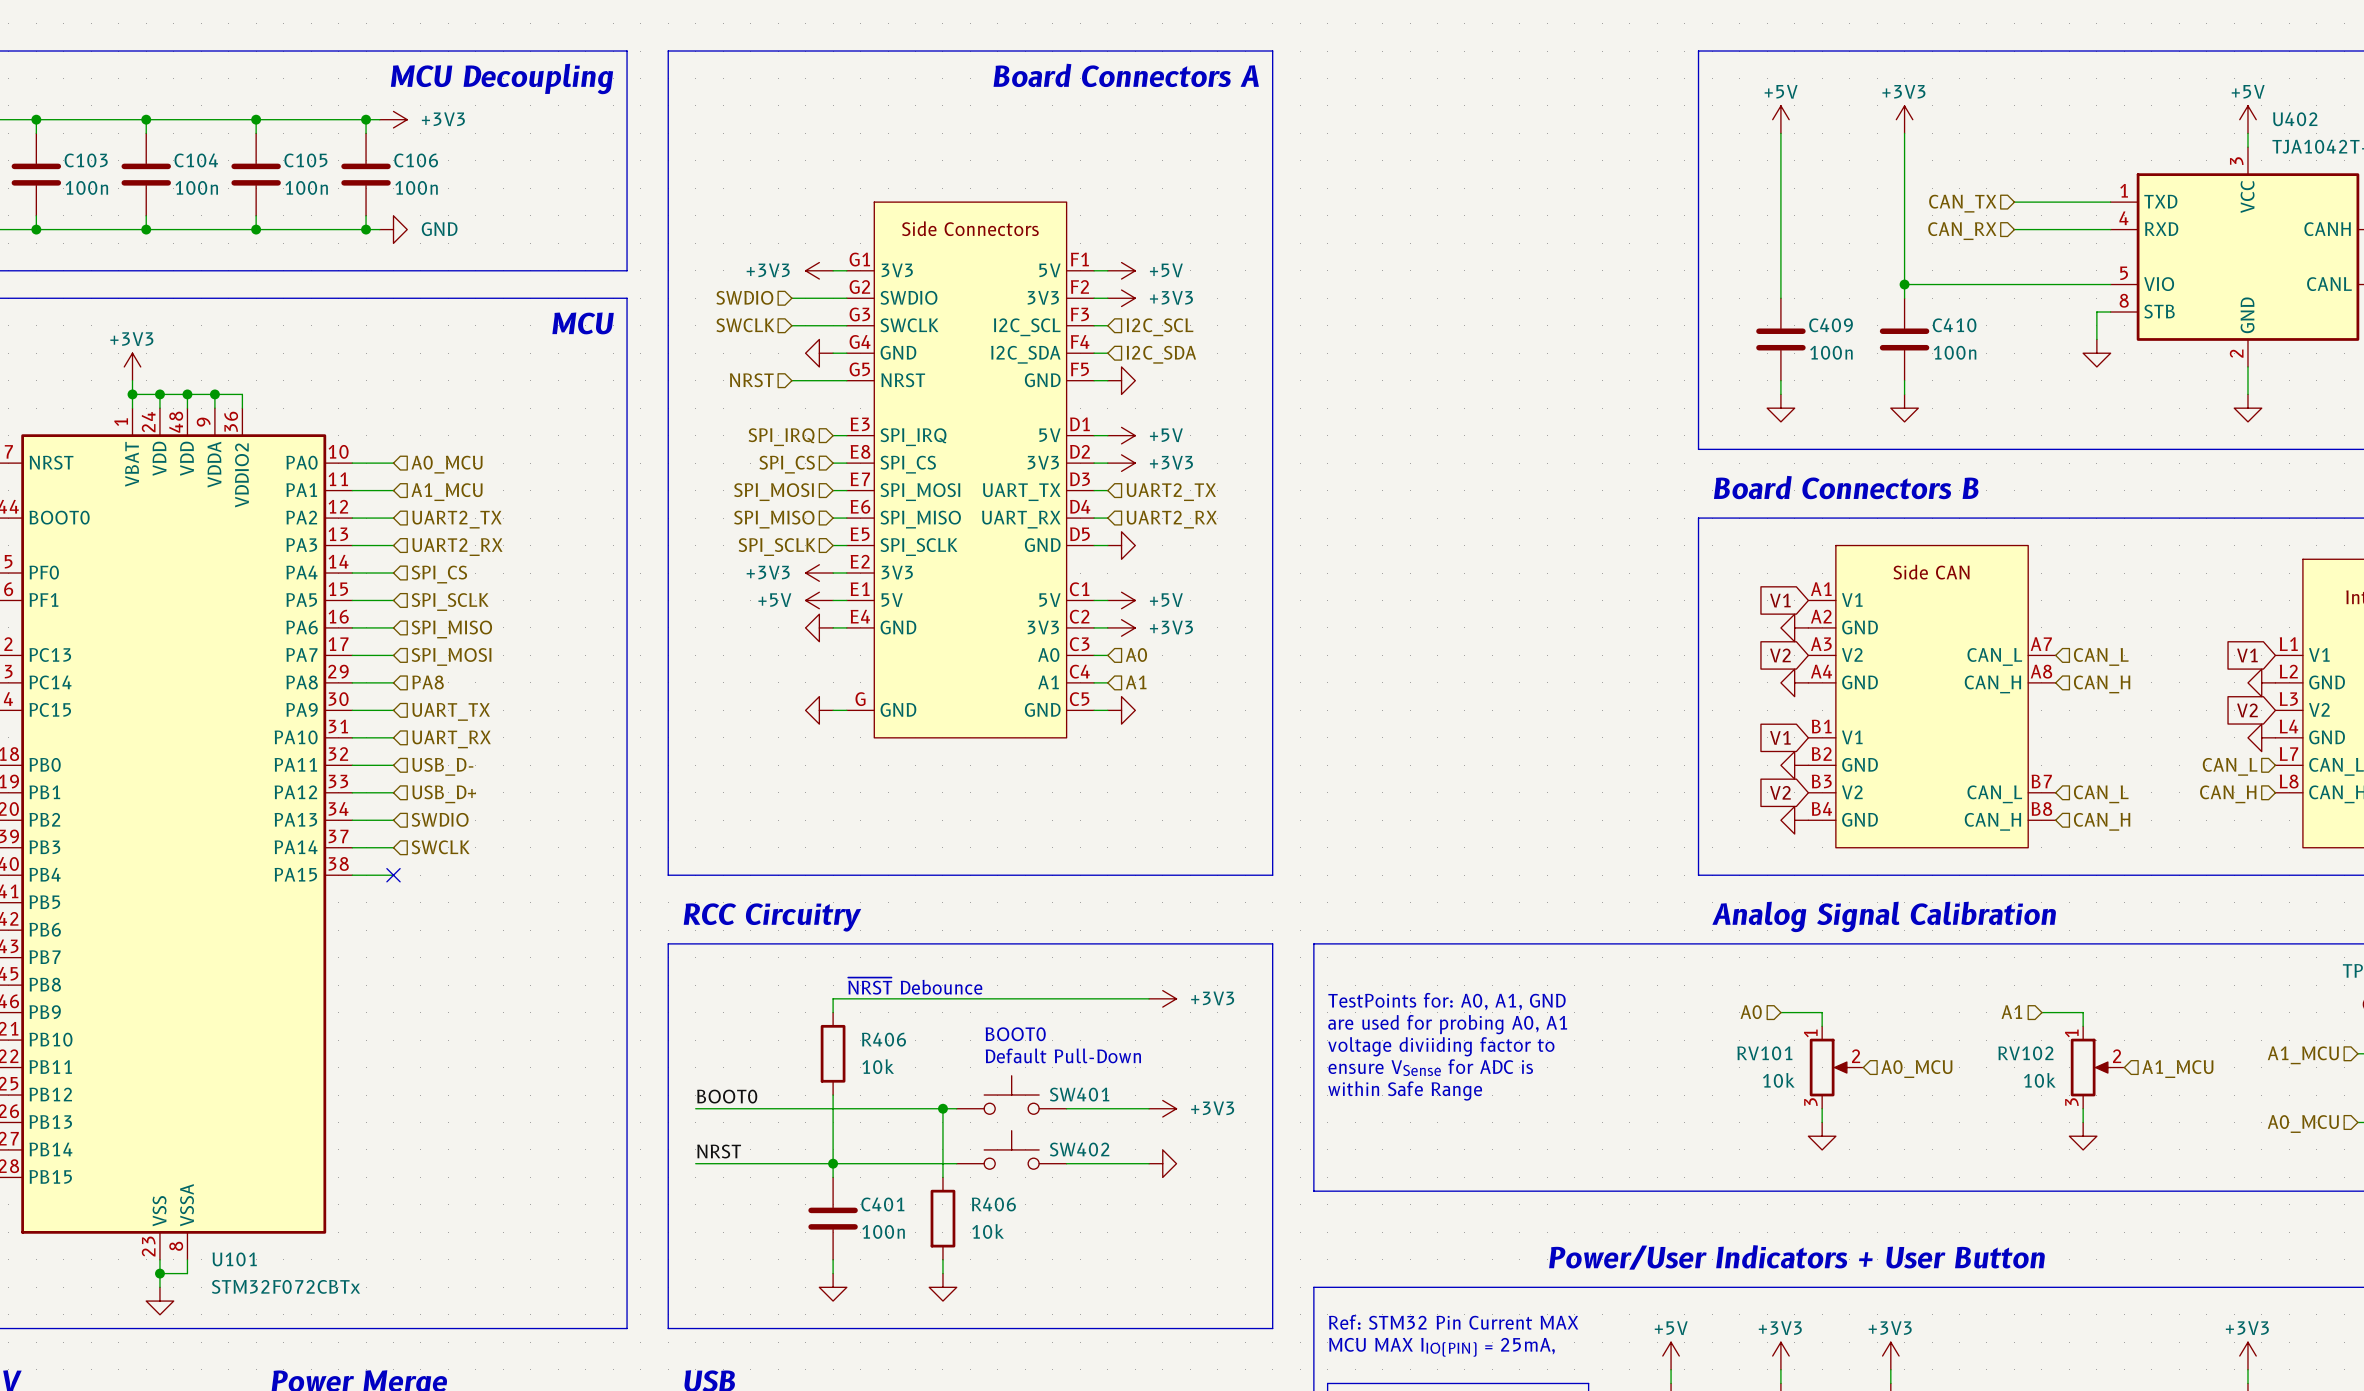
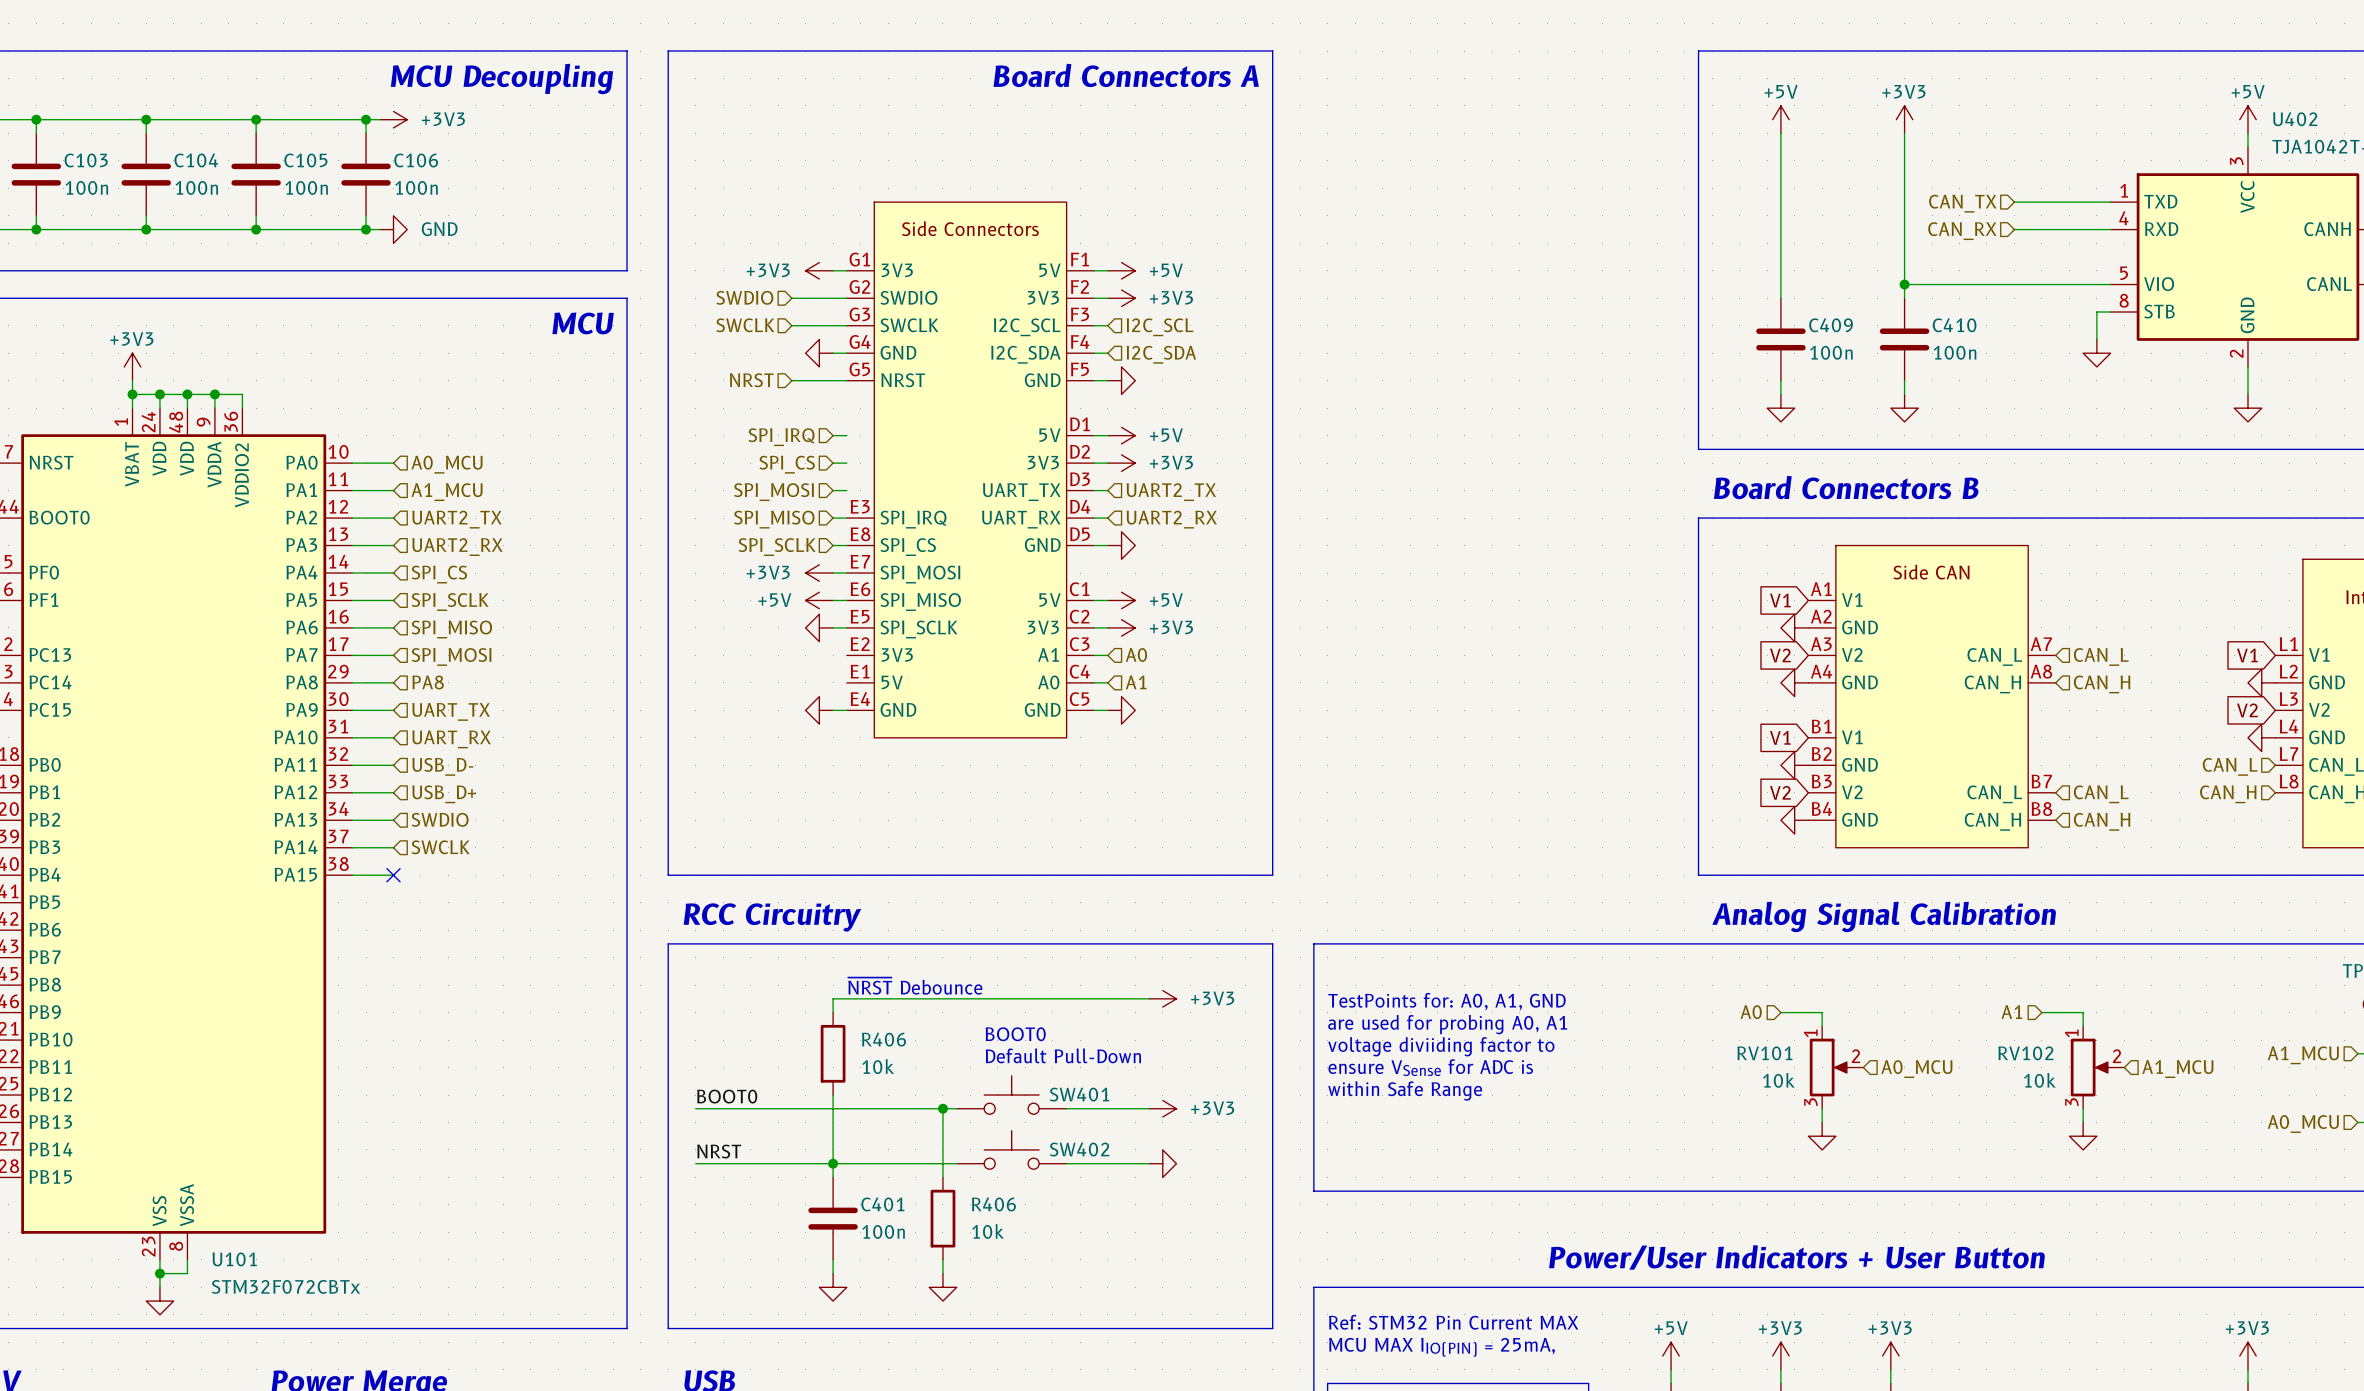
part symbol: [846, 202, 1095, 738] -> [846, 202, 1095, 738]

